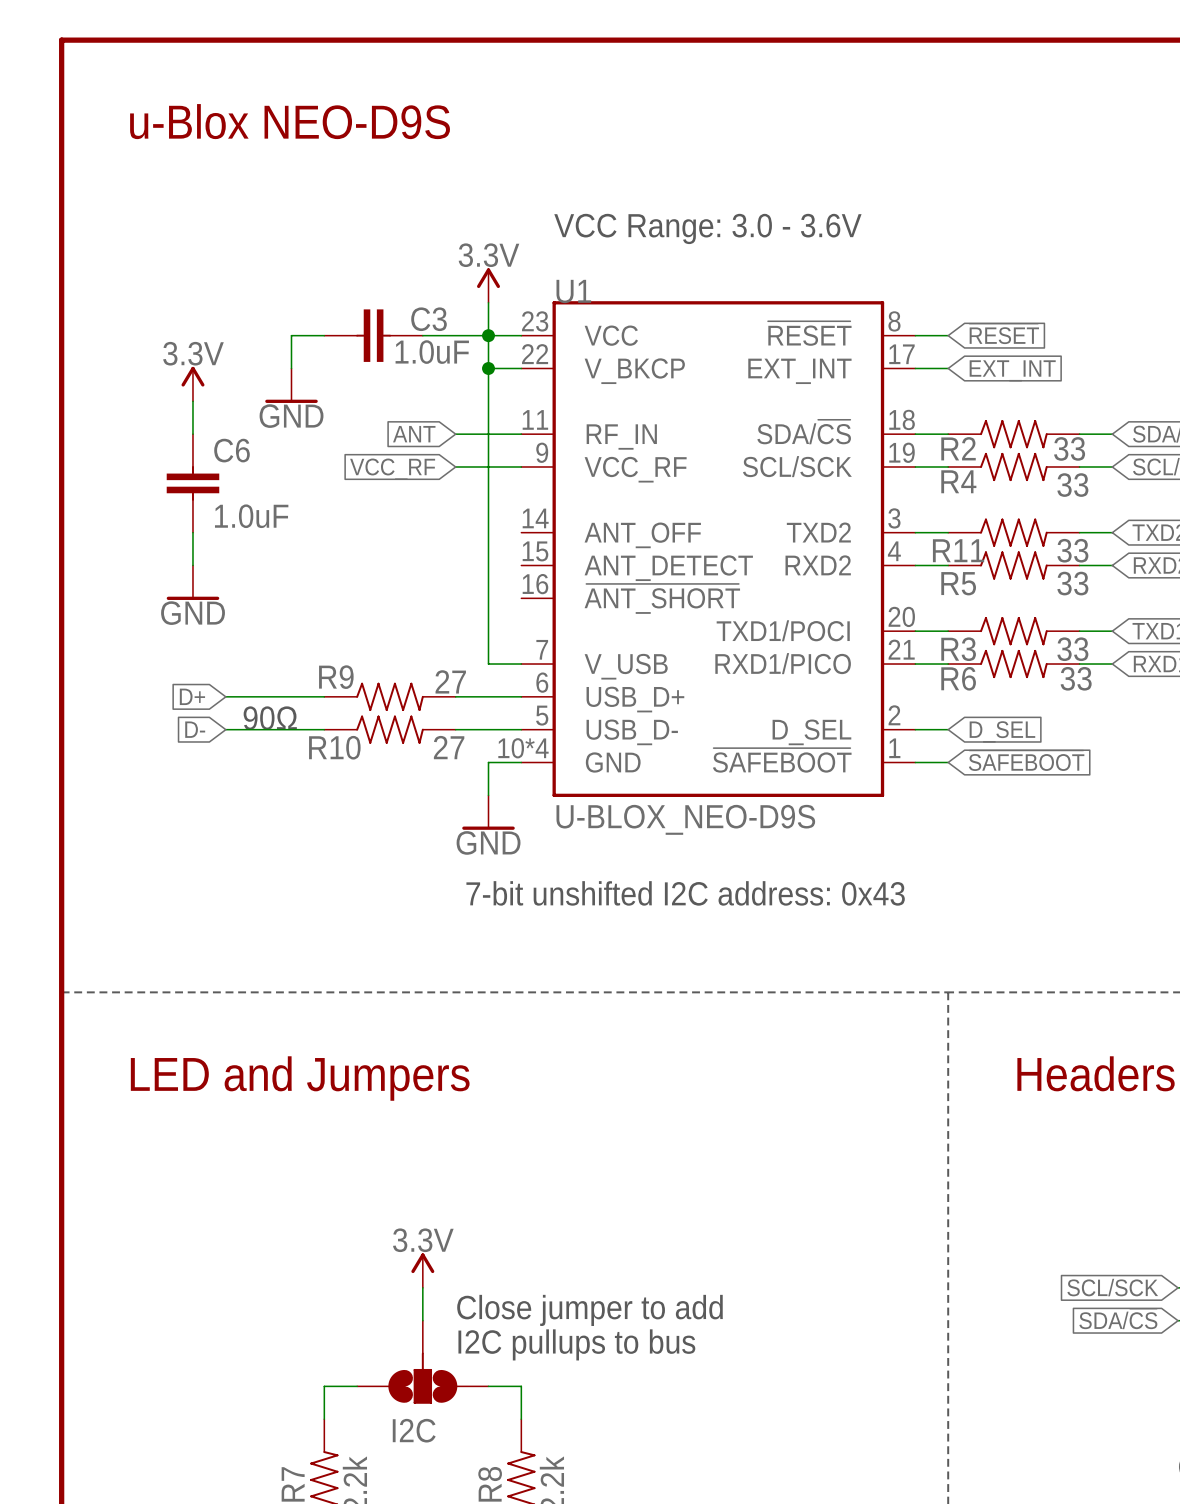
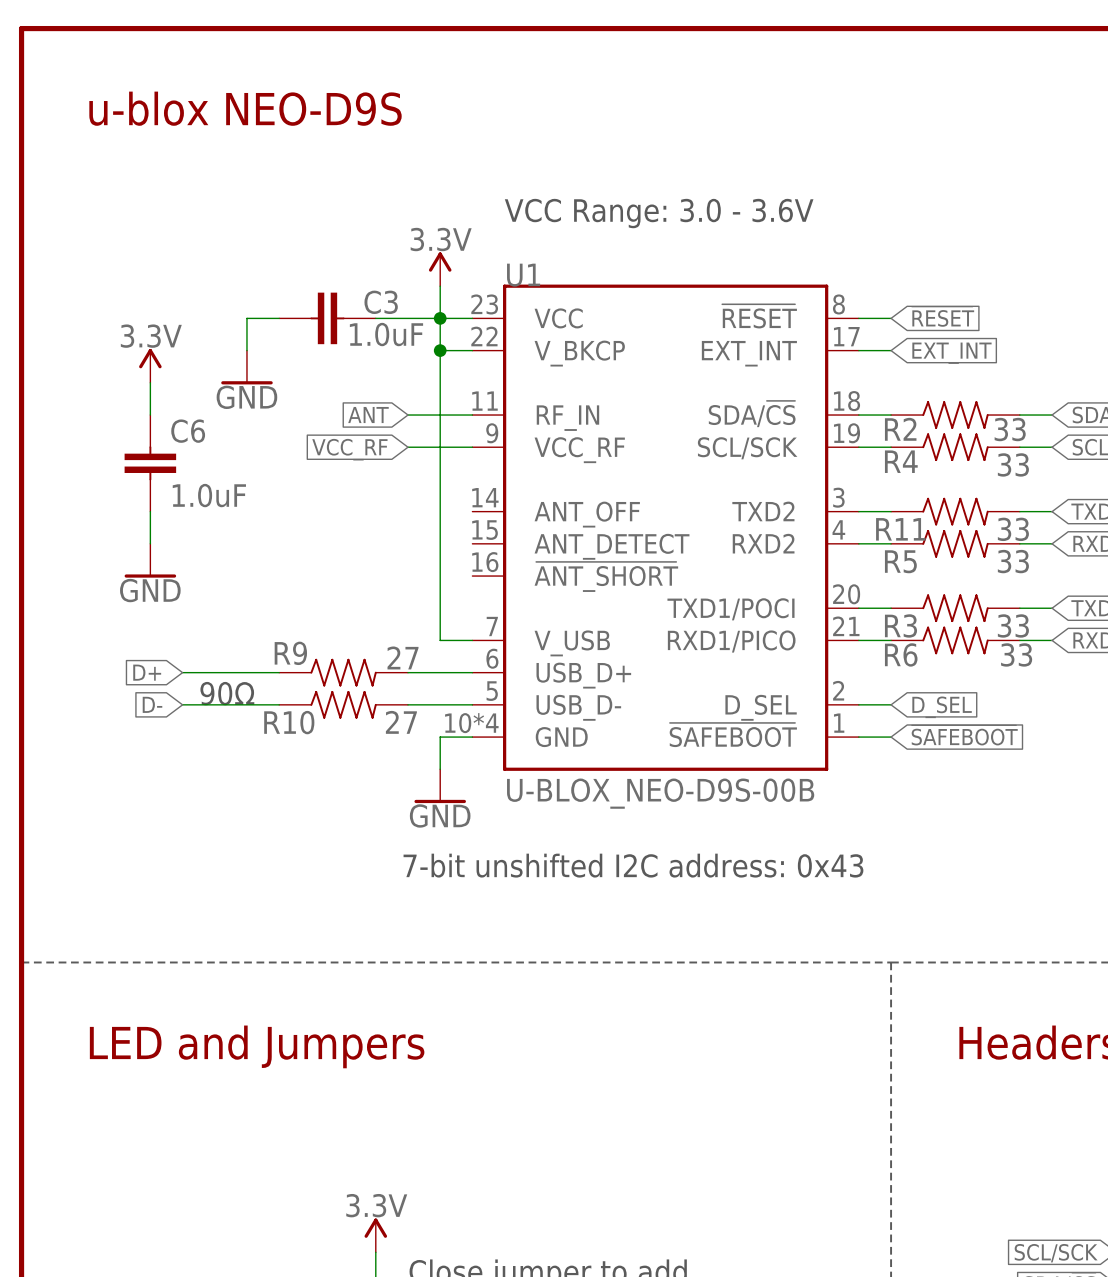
text: u-Blox NEO-D9S (290, 121) -> u-blox NEO-D9S (245, 108)
U1 value: U-BLOX_NEO-D9S (685, 819) -> U-BLOX_NEO-D9S-00B (660, 793)

